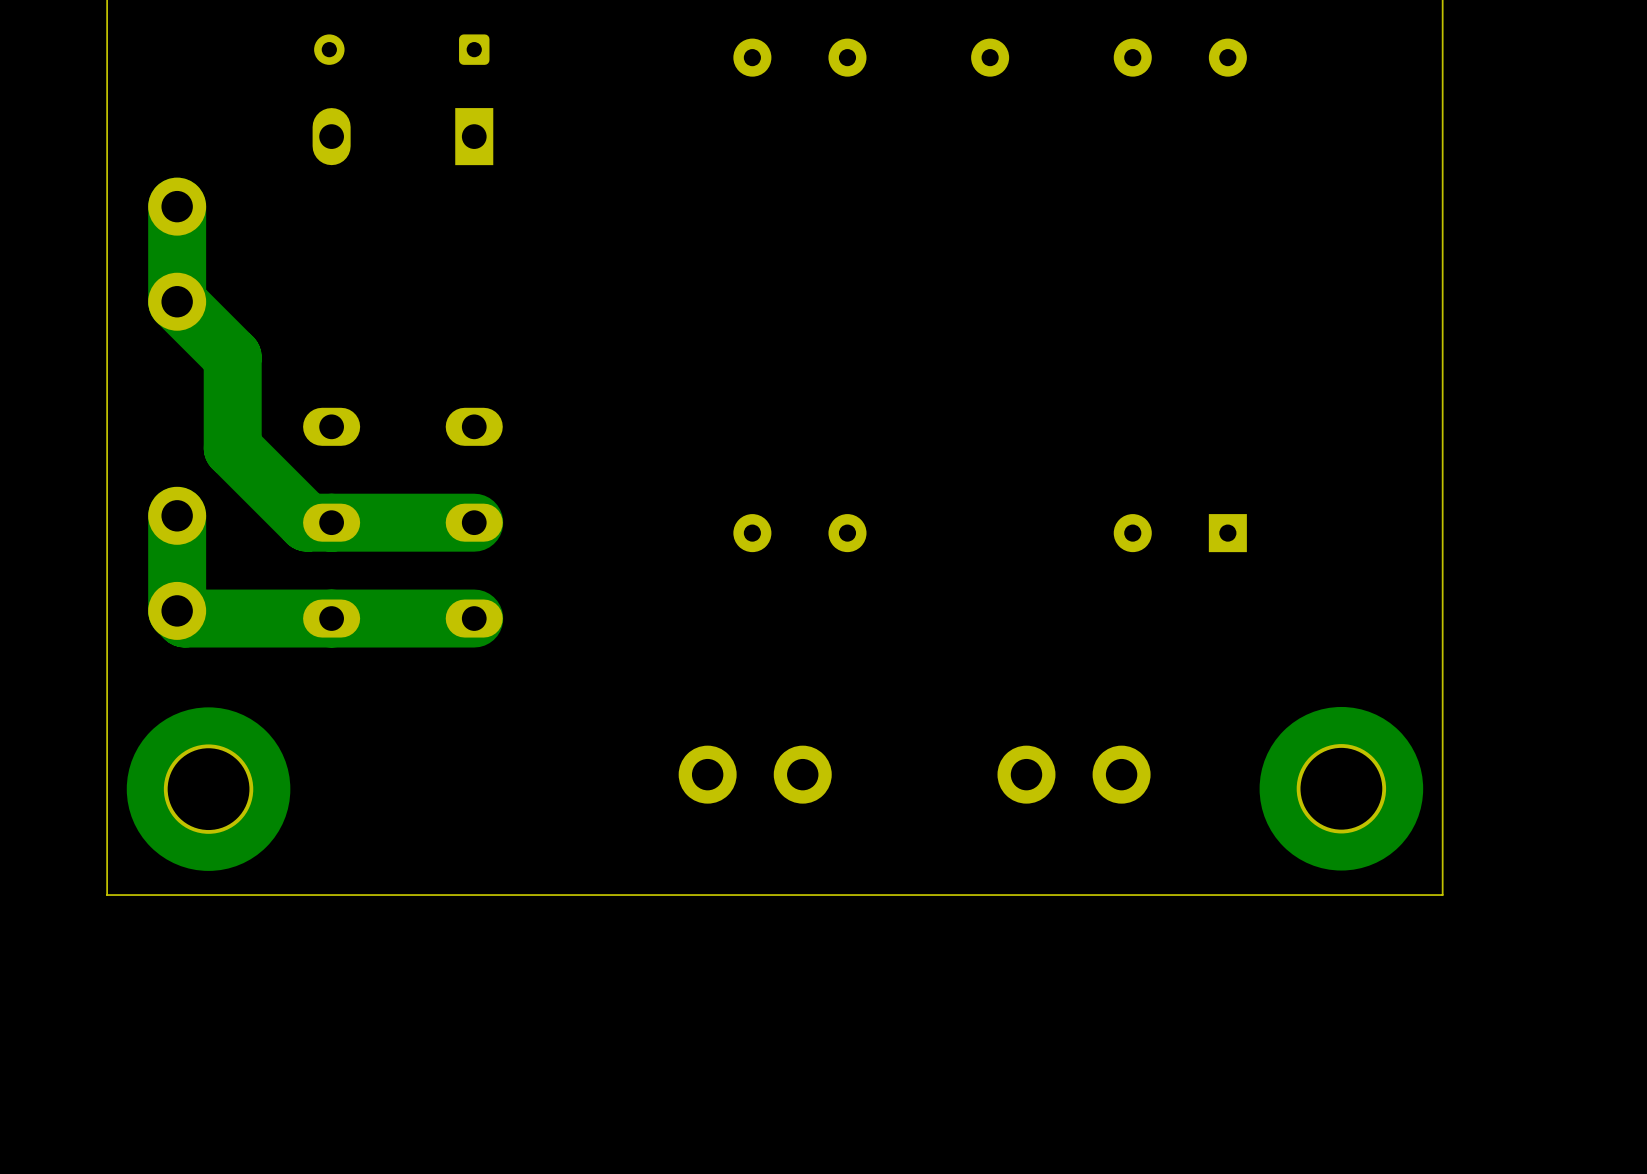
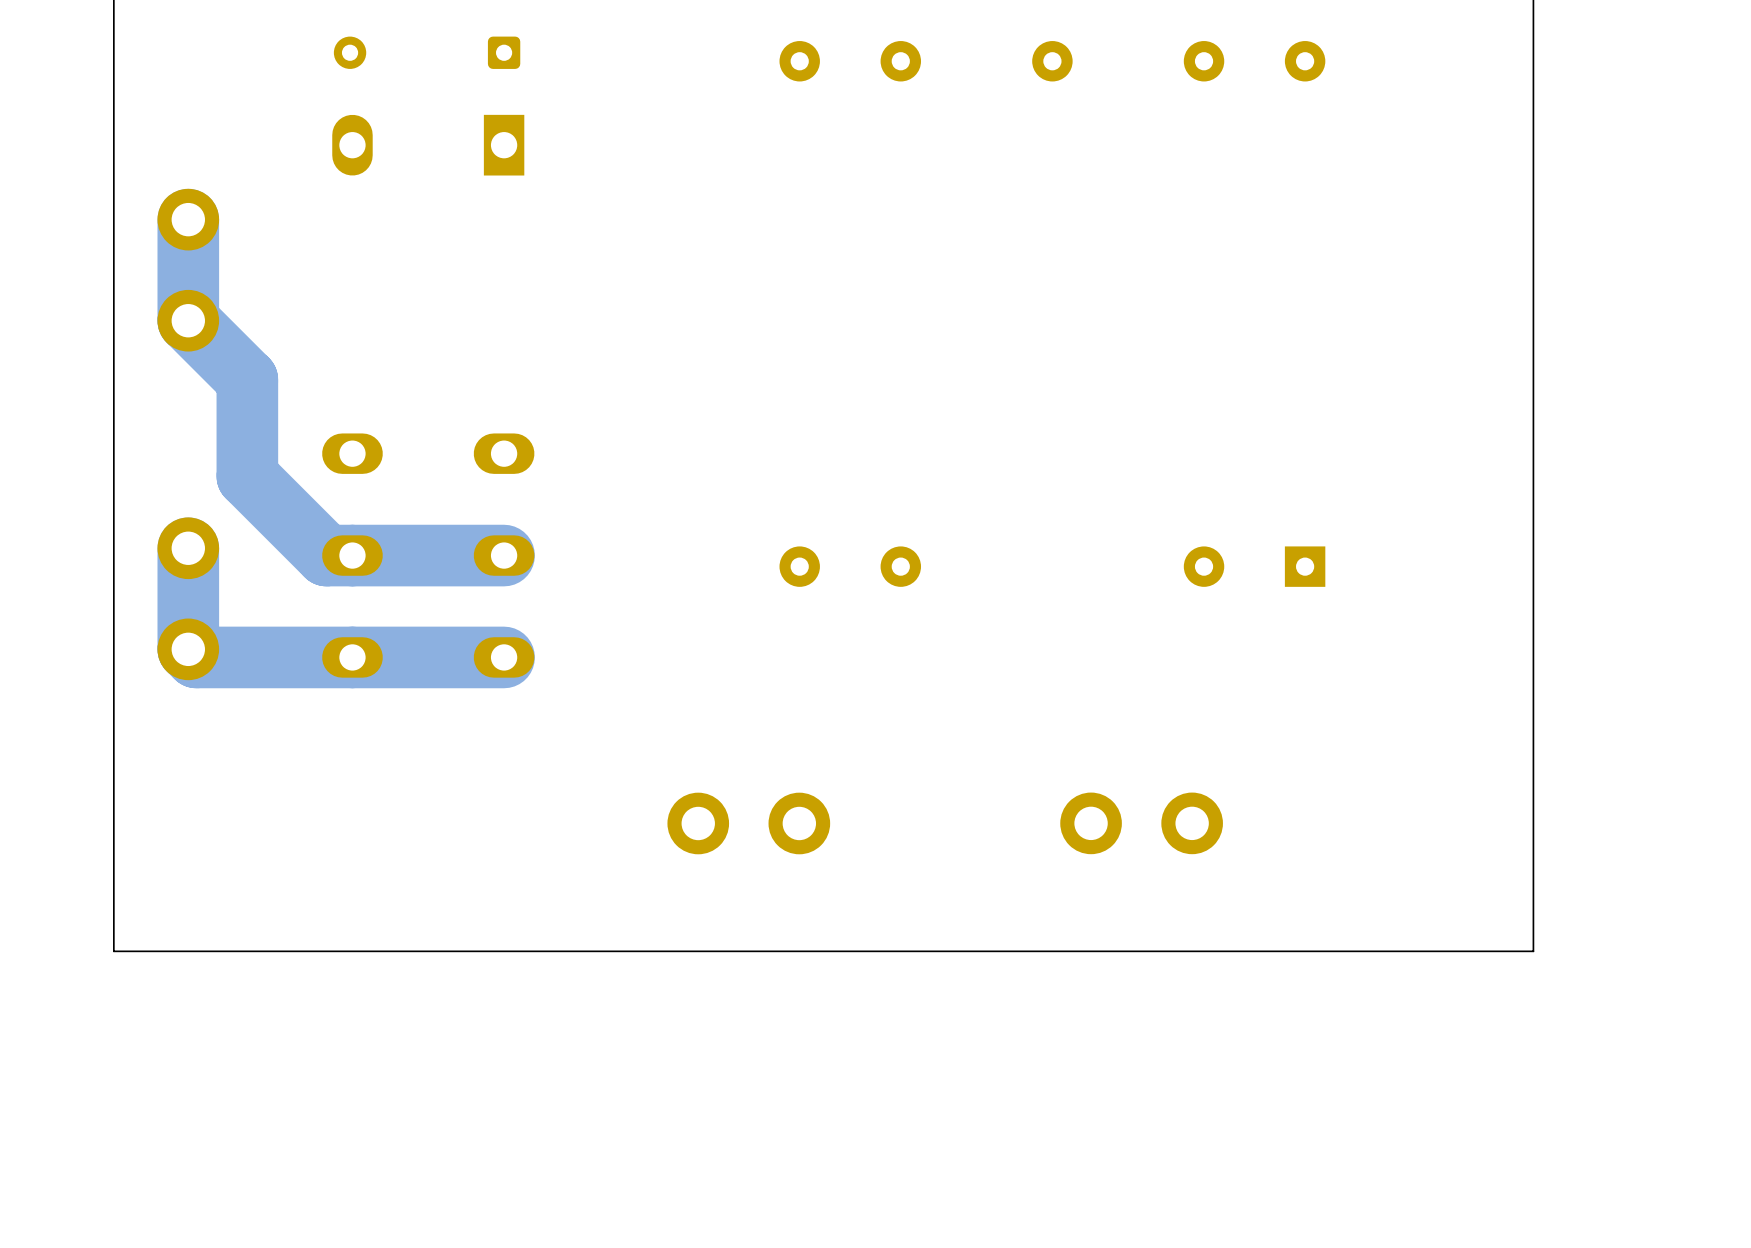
part position: (755, 774) -> (748, 823)
part: (1341, 788) -> none
part: (208, 789) -> none

